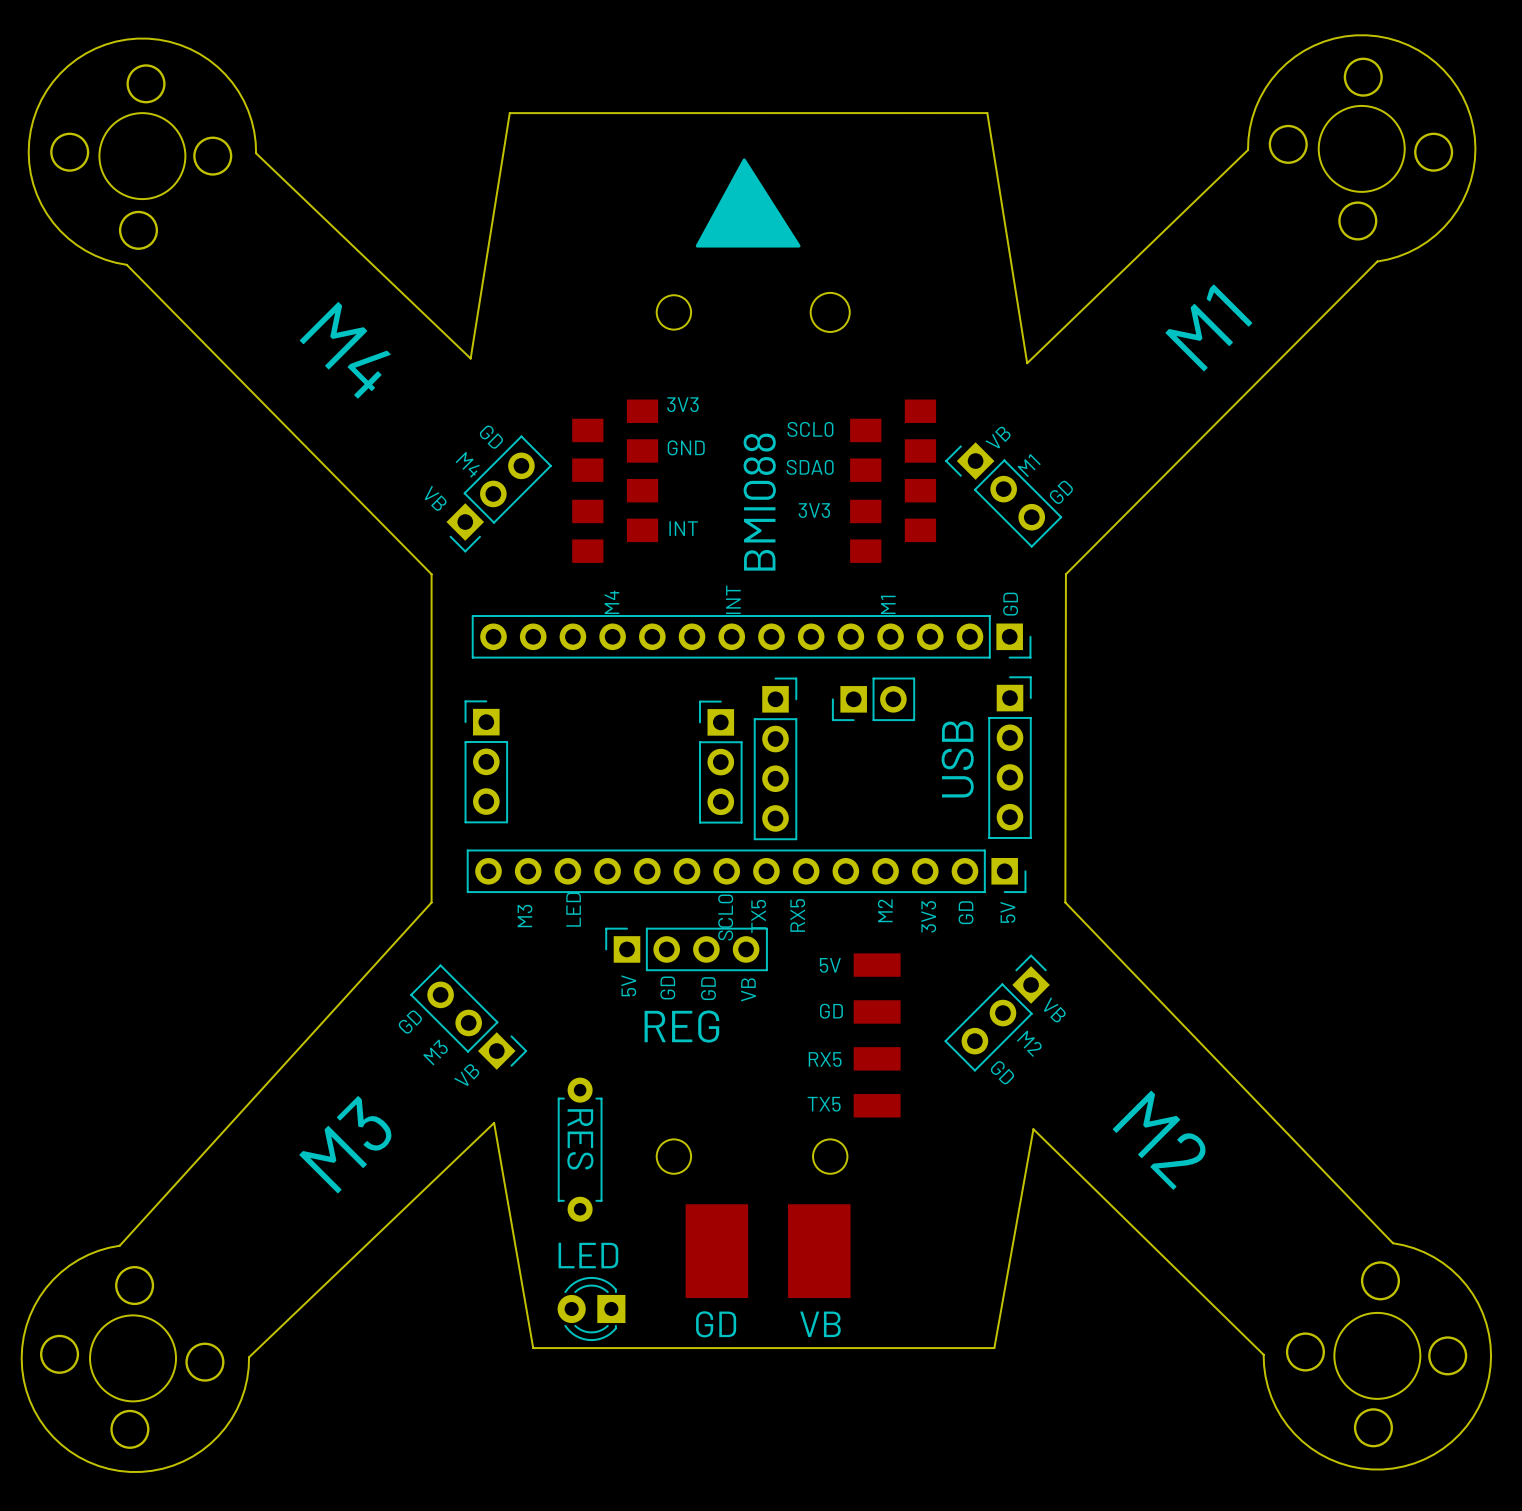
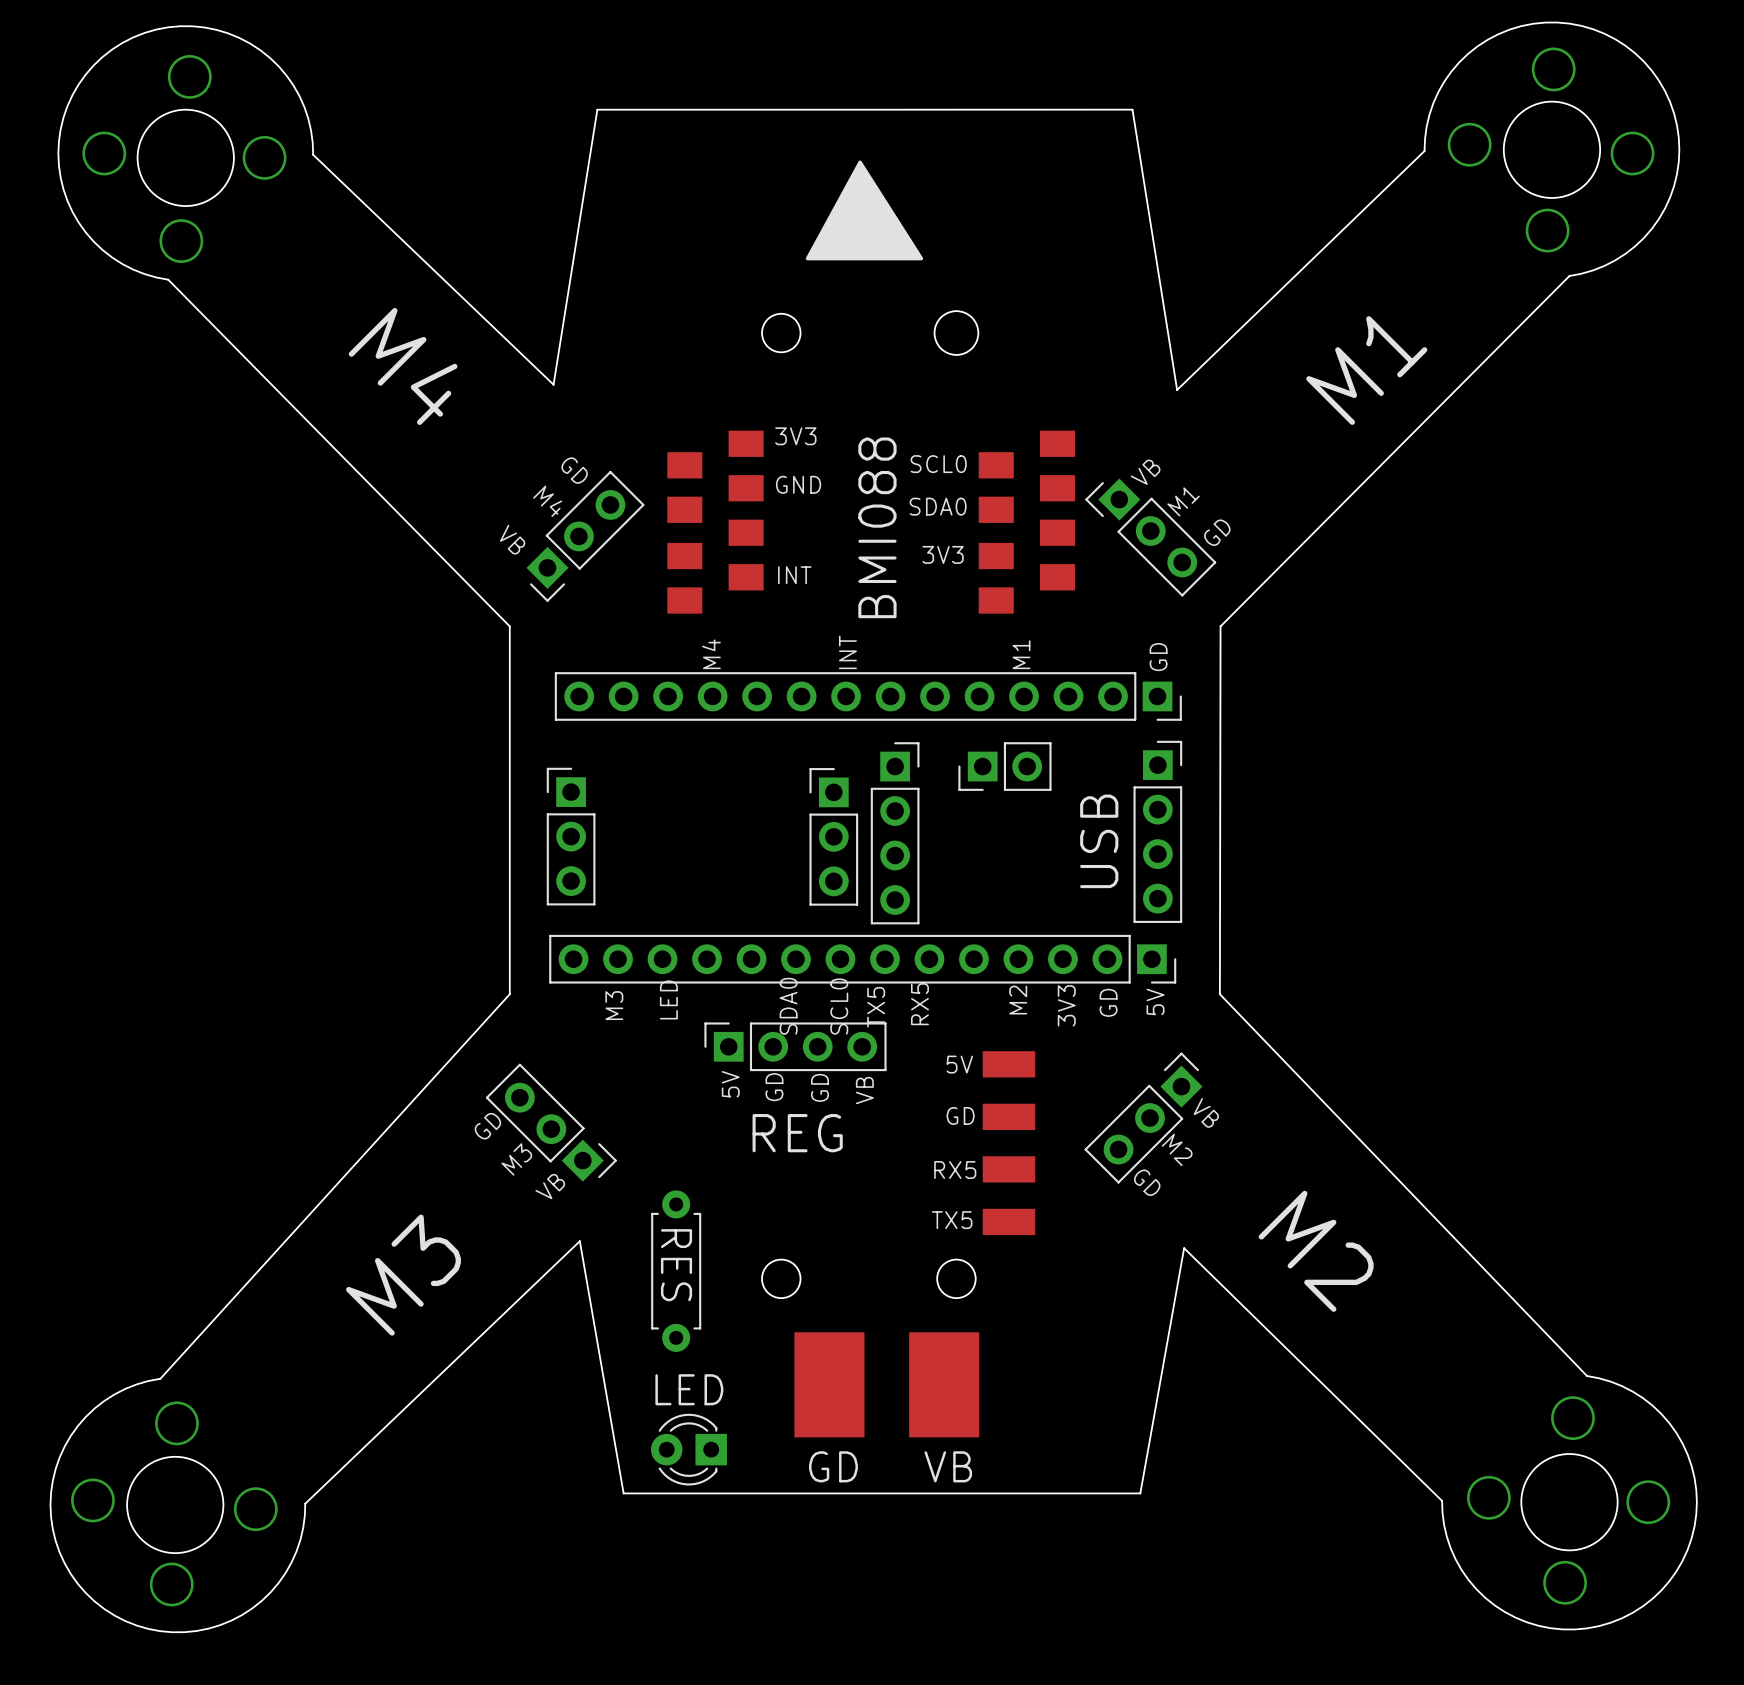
text: none -> SDA0 (788, 1006)

